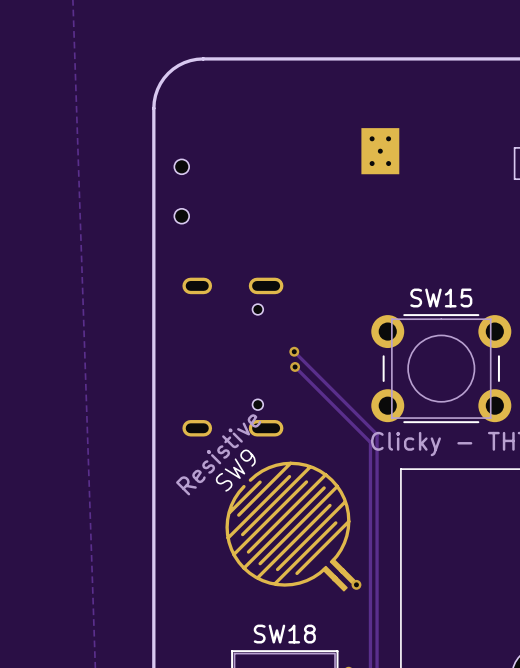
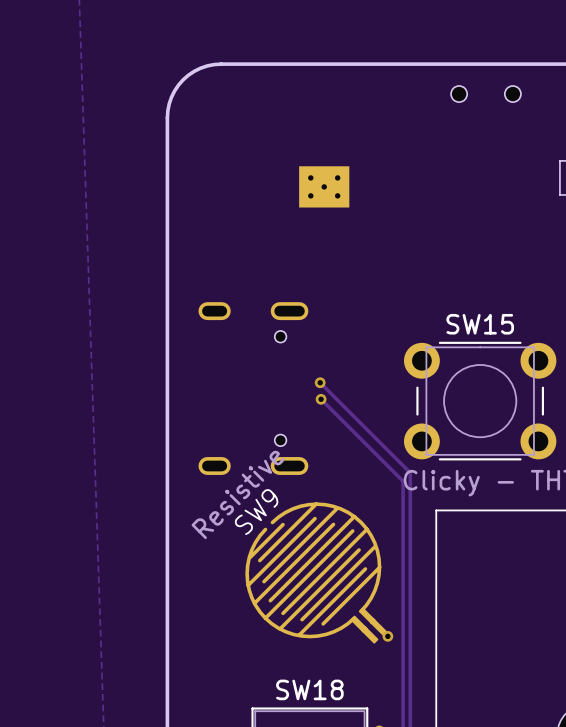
part rotation: 0° (380, 151) -> 90° clockwise (324, 186)
part position: (380, 151) -> (324, 186)
part rotation: 0° (181, 191) -> 90° clockwise (486, 94)
part position: (181, 191) -> (486, 94)

